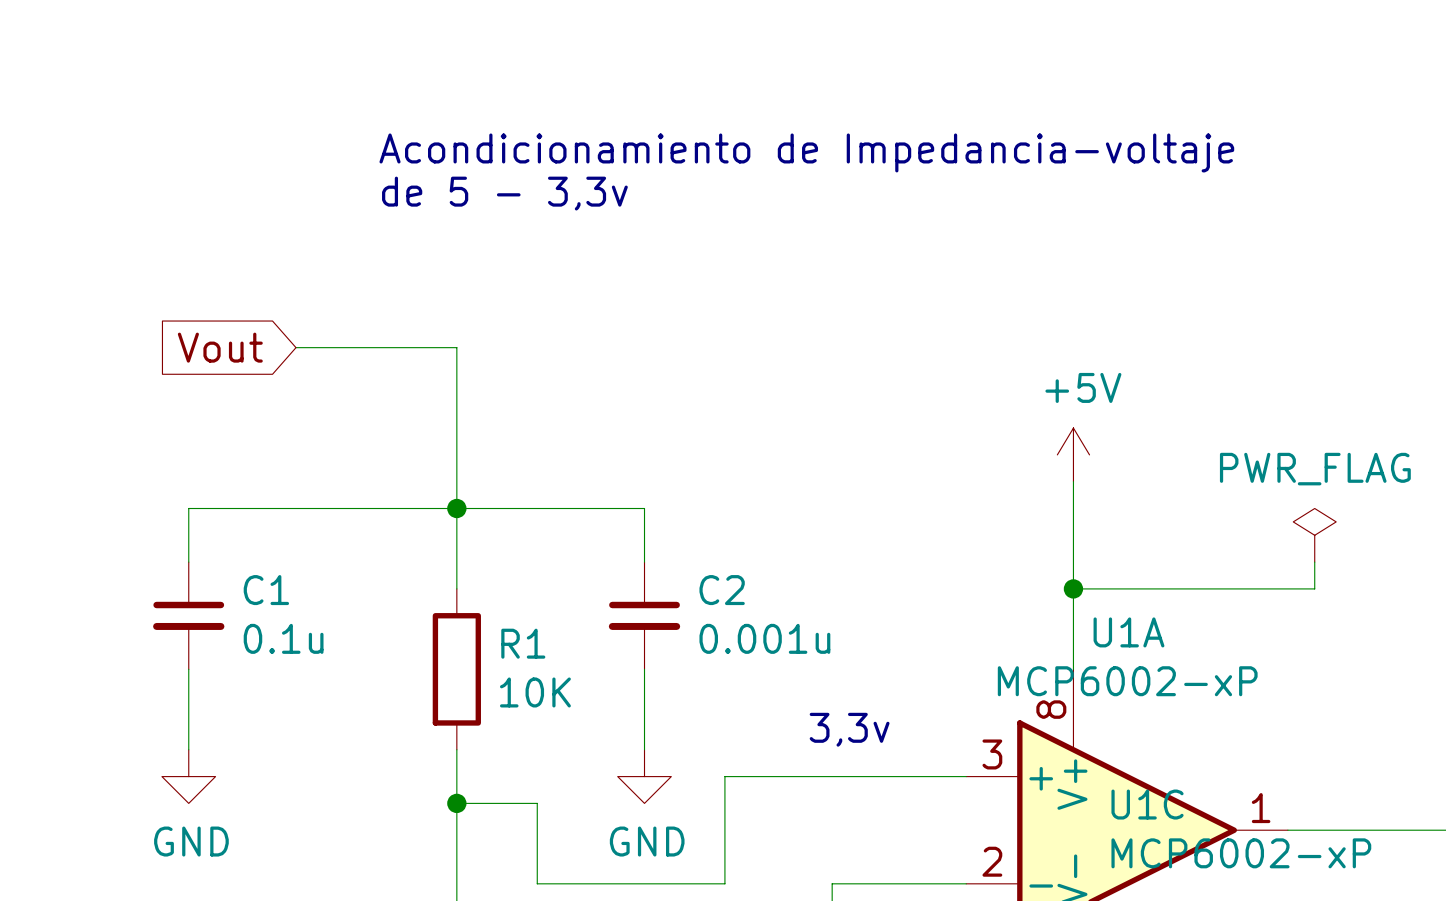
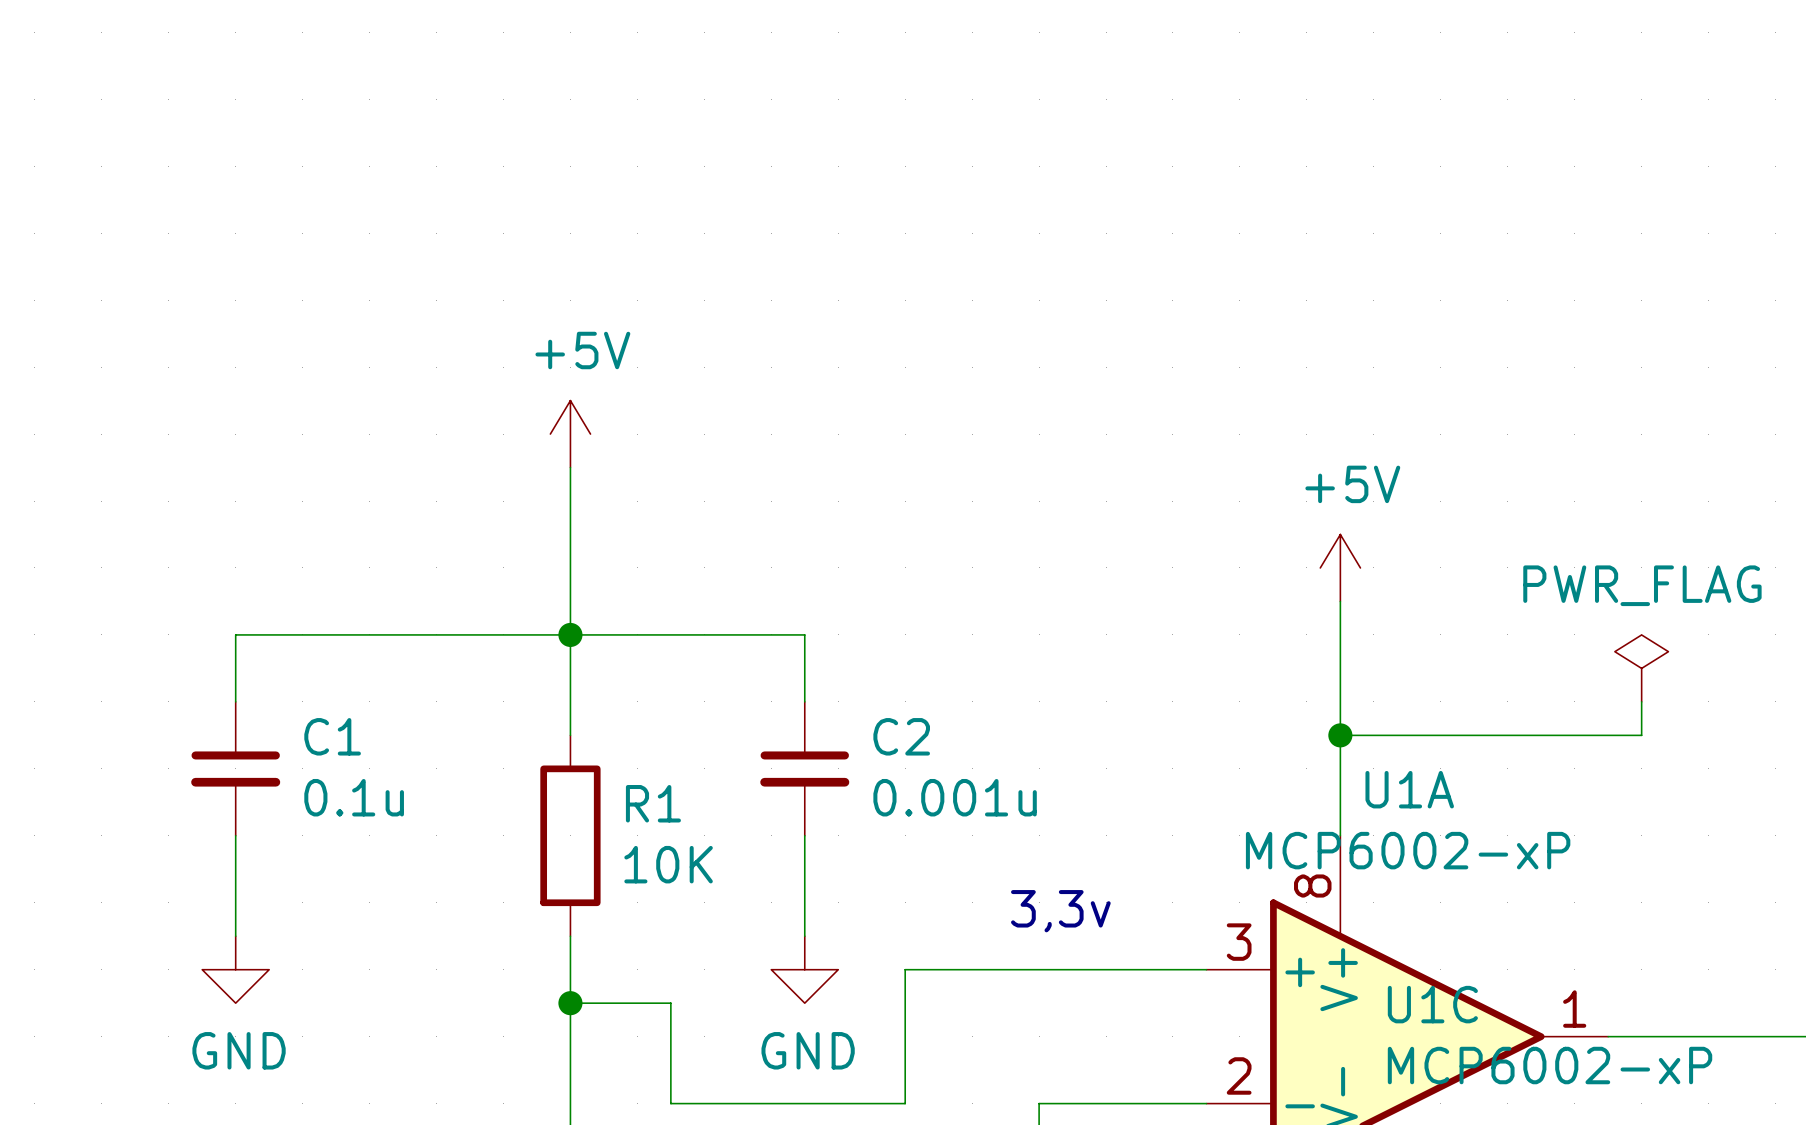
text: Acondicionamiento de Impedancia-voltaje (806, 152) -> none
text: de 5 - 3,3v (504, 193) -> none
global label: Vout (220, 347) -> none
wire: (295, 347) (456, 347) (456, 374) -> none
power symbol: none -> +5V (570, 434)

